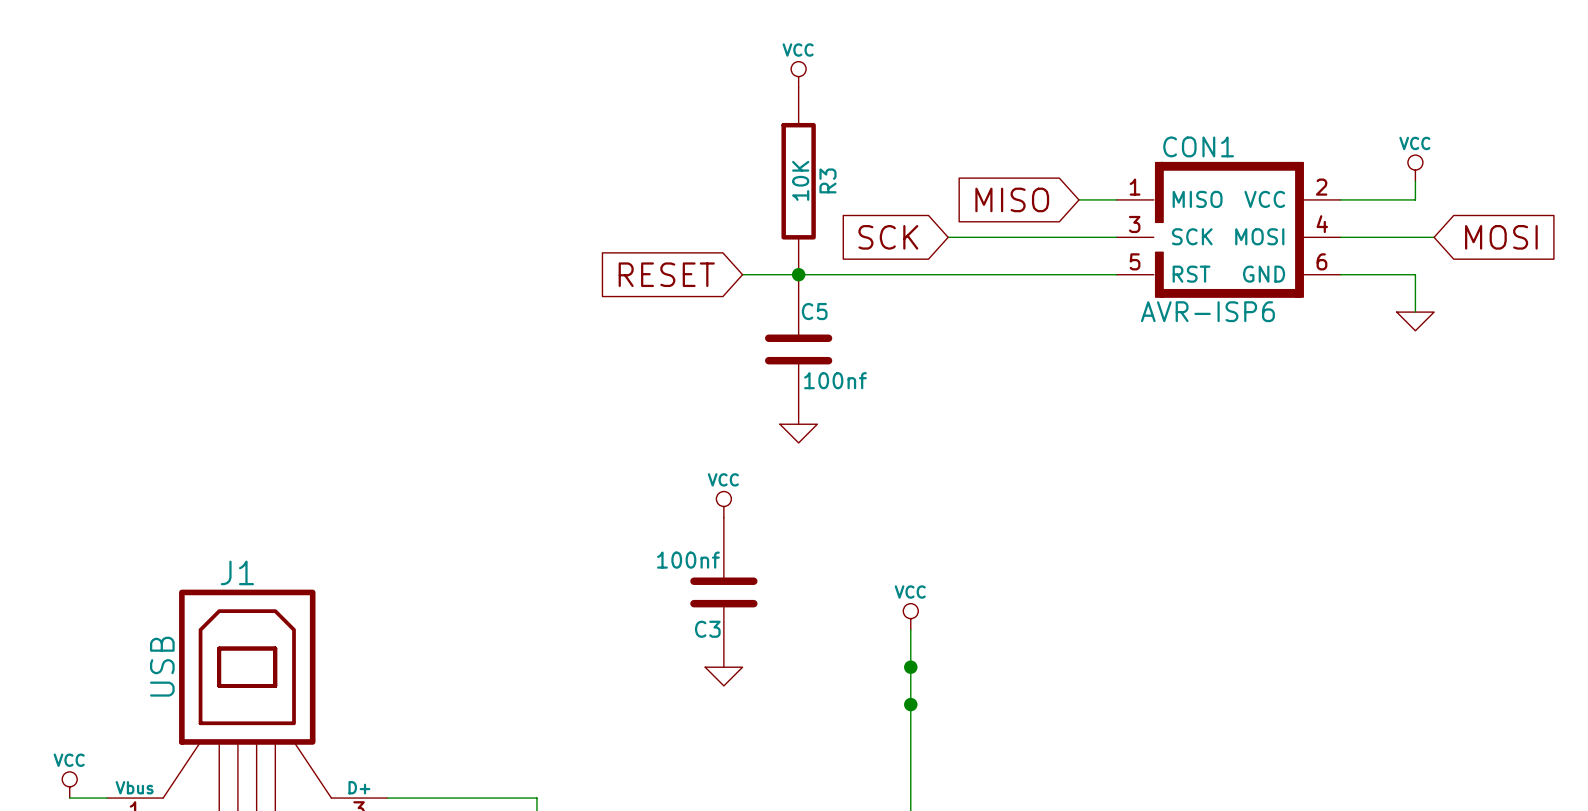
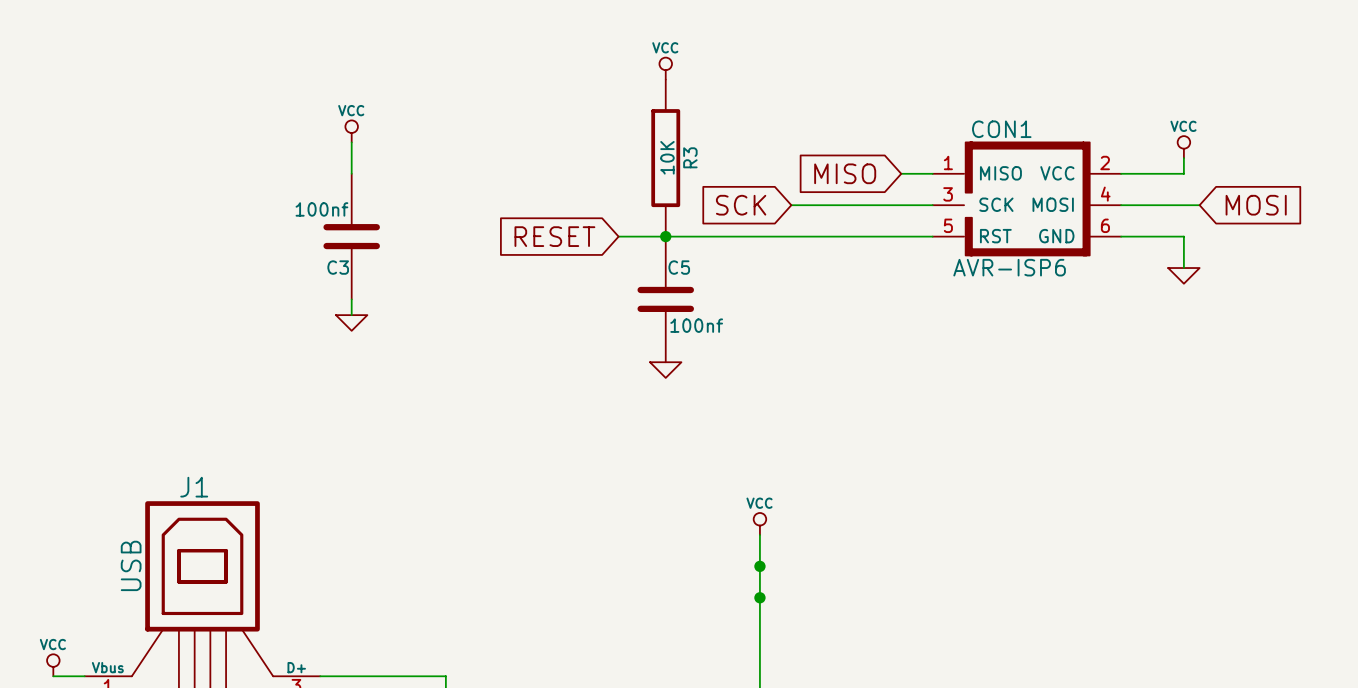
power symbol: none -> VCC (351, 131)
wire: none -> (351, 142) (351, 173)
wire: none -> (351, 299) (351, 315)
power symbol: none -> (351, 322)
power symbol: VCC (723, 504) -> none
C3 position: (723, 592) -> (351, 236)
power symbol: (723, 676) -> none

